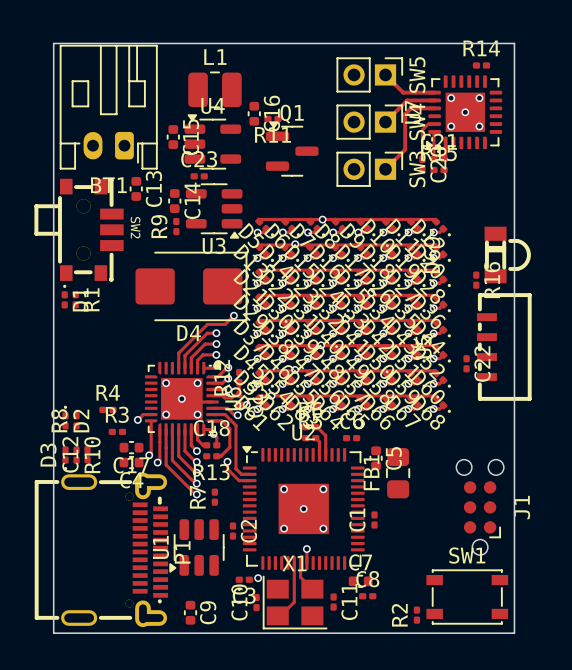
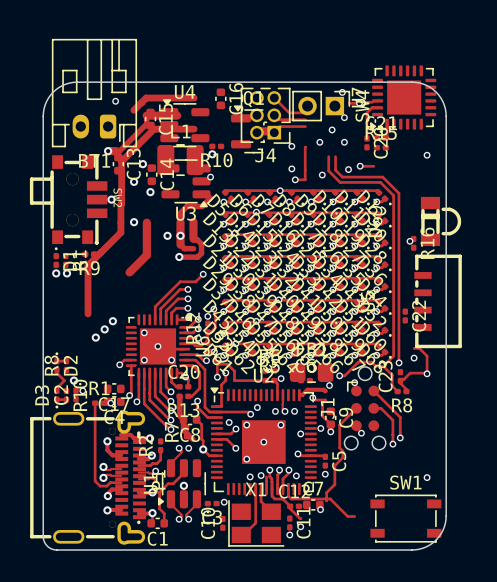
R14: (481, 65) -> none
SW5: (369, 74) -> none
track: (385, 74) (403, 92) (434, 92) -> none
L1 position: (214, 89) -> (180, 160)
via: (451, 98) -> none
via: (479, 98) -> none
track: (434, 100) (407, 100) (385, 122) -> none
via: none -> (342, 92)
track: (434, 108) (411, 108) (405, 114) (405, 149) (385, 169) -> none
track: none -> (194, 98) (146, 98) (133, 110)
track: none -> (274, 97) (289, 112) (305, 112)
via: (465, 112) -> none
via: none -> (115, 101)
track: none -> (372, 102) (349, 103)
R11: (272, 118) -> none
via: none -> (359, 103)
via: (451, 126) -> none
via: (479, 126) -> none
track: (434, 131) (433, 159) -> none
track: none -> (274, 115) (278, 119) (305, 119)
track: none -> (177, 115) (146, 115) (146, 124) (119, 151) (108, 151)
J4: none -> (265, 115)
via: none -> (344, 117)
track: none -> (305, 126) (280, 126) (274, 132)
track: none -> (194, 129) (154, 129) (121, 161) (120, 232) (88, 265) (88, 313)
via: none -> (332, 129)
via: none -> (319, 142)
via: none -> (344, 142)
R10: none -> (216, 146)
via: none -> (291, 146)
track: none -> (305, 147) (305, 179) (295, 179)
SW3: (369, 169) -> none
via: none -> (108, 151)
C23 rotation: 0° (199, 176) -> 90° clockwise (400, 376)
C23 position: (199, 176) -> (400, 376)
via: none -> (212, 154)
via: none -> (427, 155)
track: none -> (328, 156) (328, 170) (340, 182) (380, 182) (393, 195) (393, 356) (383, 366)
track: none -> (335, 156) (335, 170) (342, 177) (382, 177) (398, 193) (398, 362)
via: none -> (142, 164)
track: none -> (360, 166) (373, 166)
via: none -> (360, 166)
via: none -> (291, 168)
via: none -> (348, 169)
via: none -> (322, 175)
via: none -> (210, 177)
via: none -> (295, 179)
via: none -> (134, 181)
via: none -> (150, 192)
R9 rotation: 0° (176, 226) -> 90° clockwise (89, 254)
R9 position: (176, 226) -> (89, 254)
track: none -> (210, 197) (202, 206) (187, 206) (180, 212) (180, 244) (184, 248) (193, 248)
via: none -> (111, 199)
via: none -> (134, 222)
track: none -> (193, 222) (193, 238)
track: none -> (146, 222) (146, 255) (129, 272)
via: none -> (167, 235)
via: none -> (180, 235)
track: none -> (193, 239) (197, 239) (201, 244) (201, 253) (197, 257) (179, 257)
via: none -> (409, 241)
D4: (191, 286) -> none
via: none -> (179, 257)
via: none -> (56, 273)
via: none -> (67, 273)
track: none -> (213, 309) (215, 327) (207, 332)
via: none -> (213, 309)
via: none -> (207, 316)
via: none -> (112, 321)
via: none -> (104, 329)
via: (197, 383) -> none
via: none -> (95, 337)
track: none -> (414, 348) (419, 348) (427, 356) (427, 373) (410, 373) (402, 379) (400, 383) (406, 391)
track: none -> (214, 351) (215, 360) (218, 364) (227, 364) (234, 371) (234, 380) (260, 380)
R4: (107, 409) -> none
via: none -> (414, 358)
track: none -> (56, 361) (66, 361)
track: none -> (217, 362) (217, 377)
via: none -> (399, 362)
track: none -> (383, 366) (392, 375) (392, 386) (397, 391)
track: none -> (383, 366) (375, 366) (371, 362) (358, 362) (344, 375) (339, 375)
track: none -> (56, 369) (56, 373) (64, 380) (56, 388) (56, 390)
track: (315, 427) (325, 435) (325, 454) -> (285, 411) (282, 409) (282, 395)
C18 name: C18 (211, 428) -> C20 (183, 371)
track: none -> (225, 373) (225, 380) (221, 384) (221, 405) (216, 406)
via: none -> (225, 372)
via: none -> (427, 373)
R3: (117, 431) -> none
via: none -> (339, 375)
via: none -> (217, 377)
via: none -> (281, 378)
via: none -> (73, 380)
via: none -> (354, 382)
via: none -> (329, 385)
C5 footprint: [369, 446, 383, 471] -> [322, 453, 329, 469]
via: none -> (82, 390)
track: none -> (325, 390) (307, 389) (299, 395)
track: none -> (373, 391) (400, 417) (400, 437)
R8: none -> (402, 391)
C12 name: C12 (70, 454) -> C2 (61, 395)
track: none -> (179, 396) (179, 415) (183, 419) (183, 429) (192, 439)
track: none -> (312, 397) (315, 400) (325, 400) (322, 402) (322, 416) (330, 424) (330, 431)
via: none -> (312, 397)
track: none -> (56, 399) (66, 399)
track: none -> (95, 403) (95, 481) (100, 486) (106, 486) (110, 482) (121, 482)
R1: none -> (99, 403)
via: none -> (110, 403)
via: none -> (257, 407)
track: none -> (356, 408) (339, 425) (339, 447) (342, 451) (342, 457) (334, 465) (334, 484) (326, 492) (326, 500)
track: none -> (373, 408) (381, 408) (392, 420) (392, 444)
via: none -> (275, 411)
via: none -> (285, 411)
via: none -> (294, 411)
FB1 rotation: 0° (398, 473) -> 90° clockwise (311, 372)
FB1 position: (398, 473) -> (311, 372)
track: none -> (216, 412) (248, 412) (250, 414)
via: none -> (250, 414)
track: none -> (196, 419) (201, 424) (203, 449) (209, 455) (216, 455)
via: none -> (229, 422)
track: none -> (235, 429) (231, 433) (216, 433)
via: none -> (235, 429)
via: none -> (320, 428)
via: none -> (330, 431)
via: none -> (361, 433)
via: none -> (300, 433)
track: none -> (121, 434) (130, 434) (134, 438) (149, 438)
via: none -> (150, 438)
via: none -> (400, 437)
track: none -> (216, 439) (226, 439) (235, 448)
J1 rotation: 0° (480, 507) -> 180° (365, 408)
J1 position: (480, 507) -> (365, 408)
track: none -> (107, 441) (107, 450) (112, 455) (121, 455)
via: none -> (107, 441)
C1 footprint: [371, 511, 378, 529] -> [147, 517, 169, 530]
via: none -> (392, 444)
track: none -> (179, 448) (181, 452) (170, 463) (170, 468)
via: none -> (179, 448)
via: none -> (188, 448)
via: none -> (235, 448)
via: none -> (203, 449)
track: none -> (160, 450) (160, 459) (156, 463) (138, 465)
track: none -> (297, 453) (298, 455) (325, 456)
via: none -> (297, 453)
track: none -> (151, 455) (148, 458) (138, 458)
via: none -> (151, 455)
via: (323, 528) -> none
C2: (232, 531) -> none
track: none -> (103, 466) (106, 469) (121, 469)
via: none -> (103, 466)
track: none -> (183, 468) (183, 473) (173, 483) (168, 483) (159, 492)
track: none -> (269, 470) (271, 481)
via: none -> (269, 470)
track: none -> (279, 470) (277, 488)
via: none -> (279, 470)
track: none -> (288, 470) (288, 472) (282, 478) (282, 489)
via: none -> (288, 470)
track: none -> (155, 471) (153, 473) (138, 472)
via: none -> (155, 471)
via: none -> (325, 474)
track: none -> (121, 475) (106, 474) (103, 477)
U1 position: (196, 547) -> (182, 483)
via: none -> (261, 475)
via: none -> (296, 475)
via: none -> (250, 476)
via: (306, 549) -> none
via: none -> (427, 477)
via: none -> (103, 477)
track: none -> (138, 479) (153, 478) (155, 480)
track: none -> (272, 481) (272, 496) (274, 499) (282, 499) (300, 518)
via: none -> (183, 485)
track: none -> (121, 489) (112, 489) (107, 496)
track: none -> (288, 489) (288, 496) (291, 499) (330, 499) (347, 516) (354, 516)
via: none -> (152, 492)
track: none -> (159, 492) (138, 492)
track: none -> (159, 492) (159, 508) (164, 513) (164, 523)
via: none -> (107, 496)
track: none -> (170, 499) (170, 504) (181, 514) (179, 519)
track: none -> (196, 499) (196, 504) (186, 514) (188, 519)
C8 name position: C8 (367, 579) -> C8 (190, 434)
C12: none -> (294, 506)
via: none -> (320, 509)
via: none -> (107, 510)
track: none -> (121, 509) (107, 510)
via: none -> (152, 513)
track: none -> (138, 513) (152, 513) (151, 523)
C8 footprint: [359, 593, 377, 600] -> [179, 413, 201, 426]
via: none -> (179, 519)
via: none -> (188, 519)
via: none -> (300, 526)
C9 position: (190, 612) -> (330, 417)
via: none -> (289, 534)
R2 position: (416, 615) -> (160, 445)
board edge: (65, 633) (53, 633) (53, 43) (514, 43) (514, 633) (474, 633) -> (56, 550) (47, 546) (43, 536) (43, 116) (45, 105) (53, 92) (66, 84) (77, 82) (412, 82) (426, 85) (438, 95) (444, 105) (446, 116) (445, 519) (442, 530) (436, 540) (423, 548) (412, 550)

